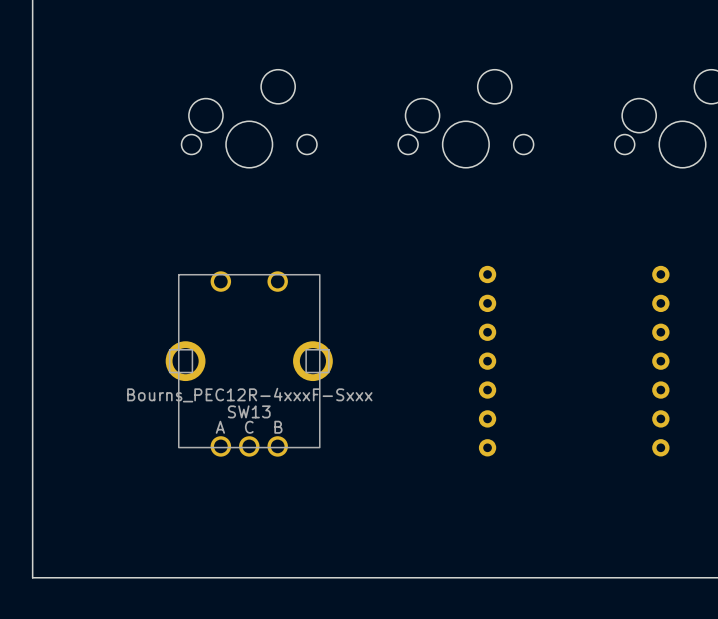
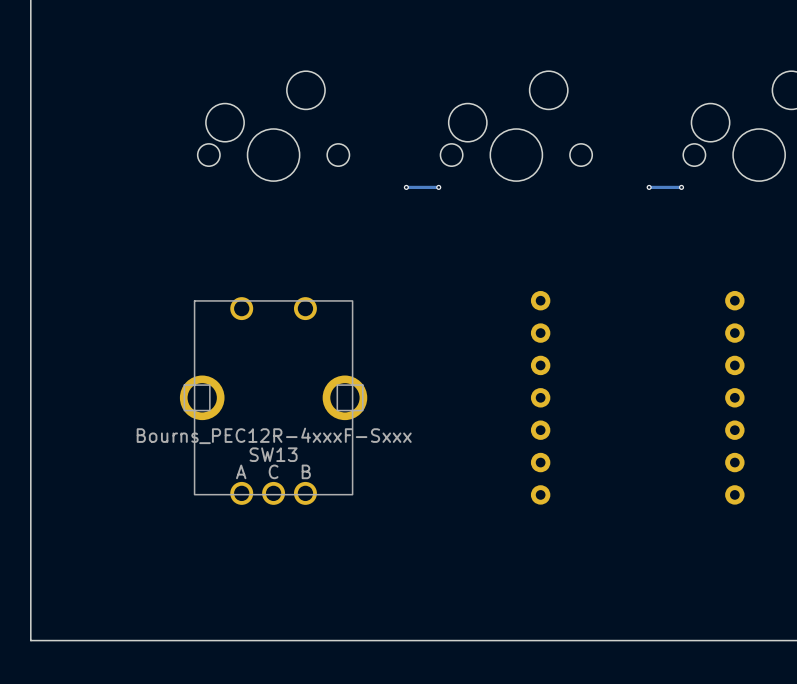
via: none -> (406, 187)
track: none -> (438, 187) (406, 187)
via: none -> (438, 187)
via: none -> (649, 187)
track: none -> (681, 187) (649, 187)
via: none -> (681, 187)

